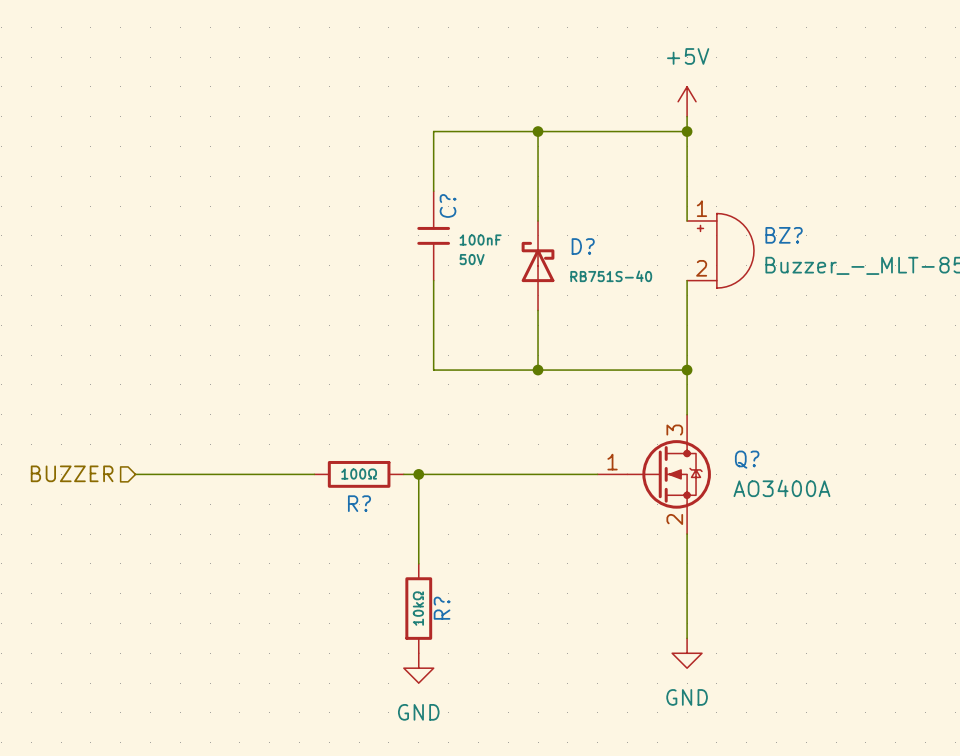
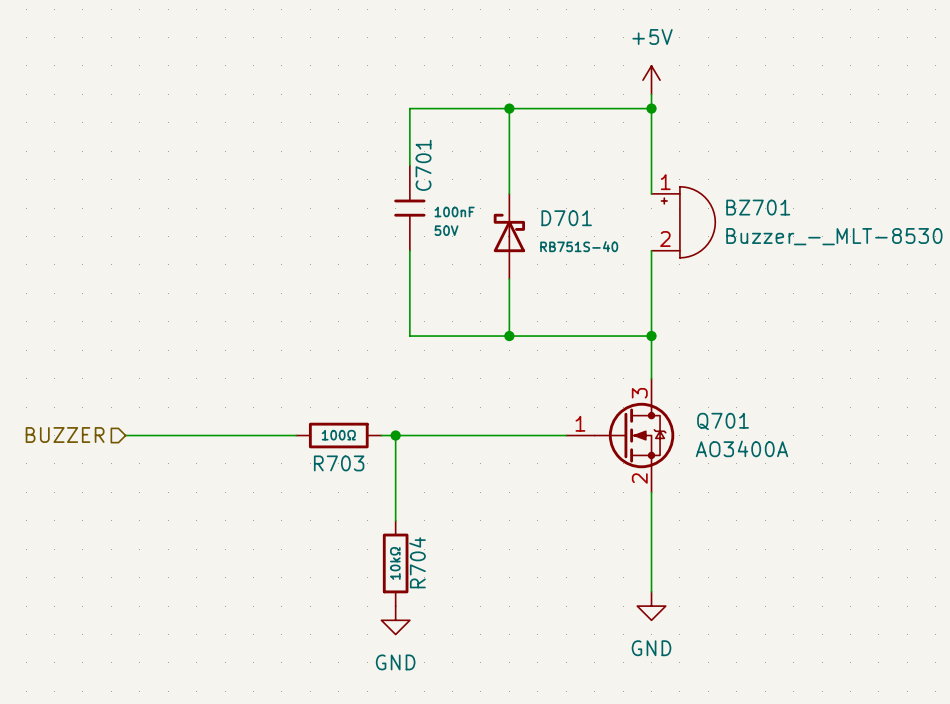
C? name: C? (448, 205) -> C701 (423, 165)
BZ? name: BZ? (784, 235) -> BZ701 (758, 207)
D? name: D? (583, 246) -> D701 (566, 218)
Q? name: Q? (747, 459) -> Q701 (723, 421)
R? name: R? (359, 503) -> R703 (339, 463)
R? name: R? (442, 608) -> R704 (417, 562)

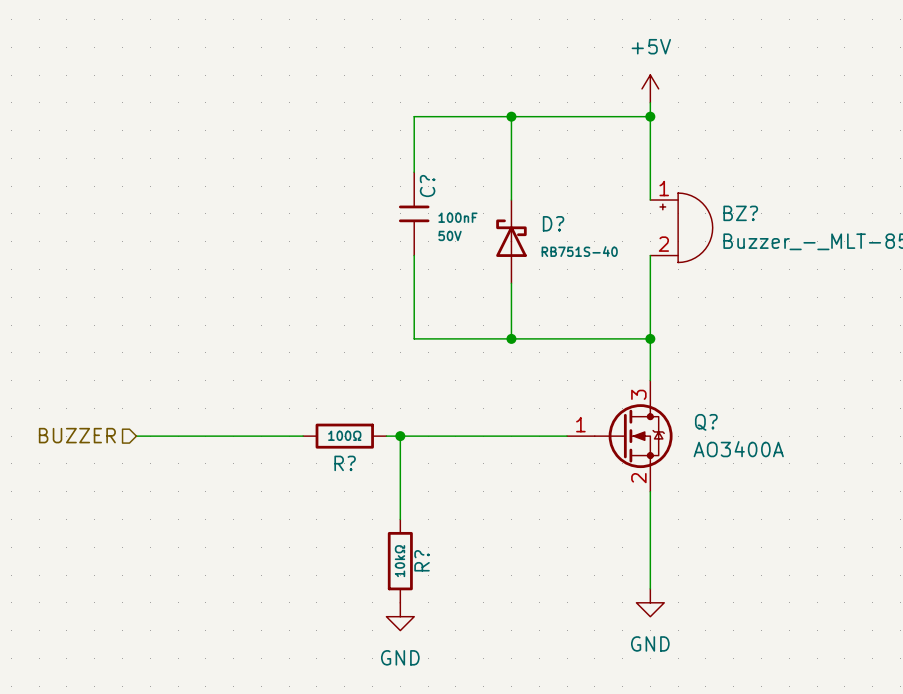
C701 name: C701 (423, 165) -> C? (427, 186)
BZ701 name: BZ701 (758, 207) -> BZ? (740, 213)
D701 name: D701 (566, 218) -> D? (553, 223)
Q701 name: Q701 (723, 421) -> Q? (706, 422)
R703 name: R703 (339, 463) -> R? (345, 463)
R704 name: R704 (417, 562) -> R? (422, 560)

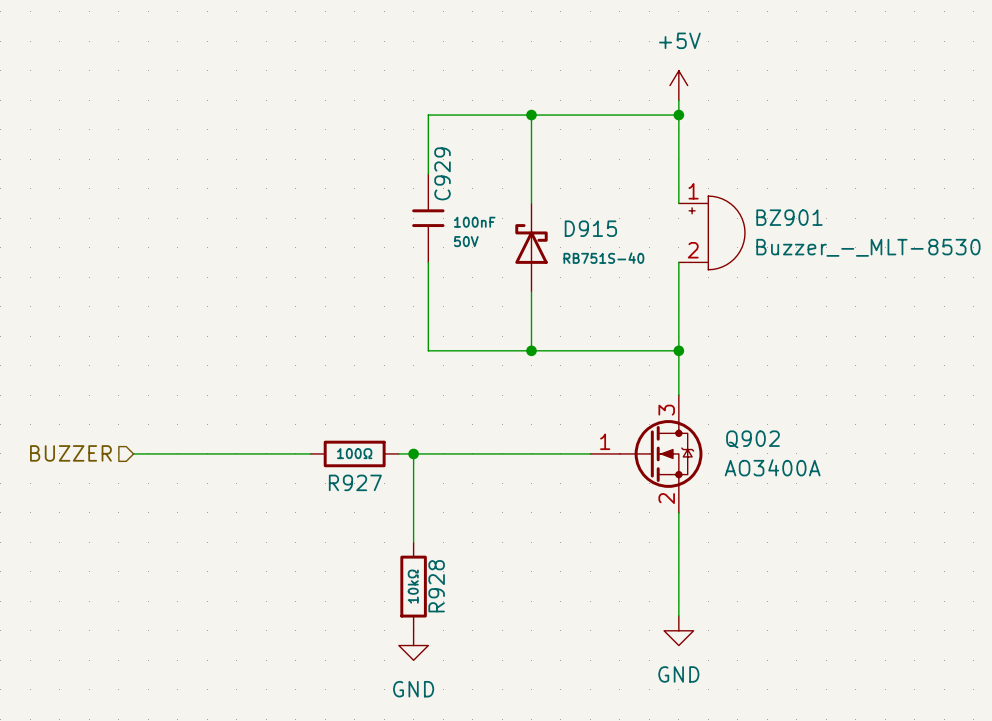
C? name: C? (427, 186) -> C929 (442, 173)
BZ? name: BZ? (740, 213) -> BZ901 (789, 217)
D? name: D? (553, 223) -> D915 (590, 228)
Q? name: Q? (706, 422) -> Q902 (752, 439)
R? name: R? (345, 463) -> R927 (355, 482)
R? name: R? (422, 560) -> R928 (436, 586)

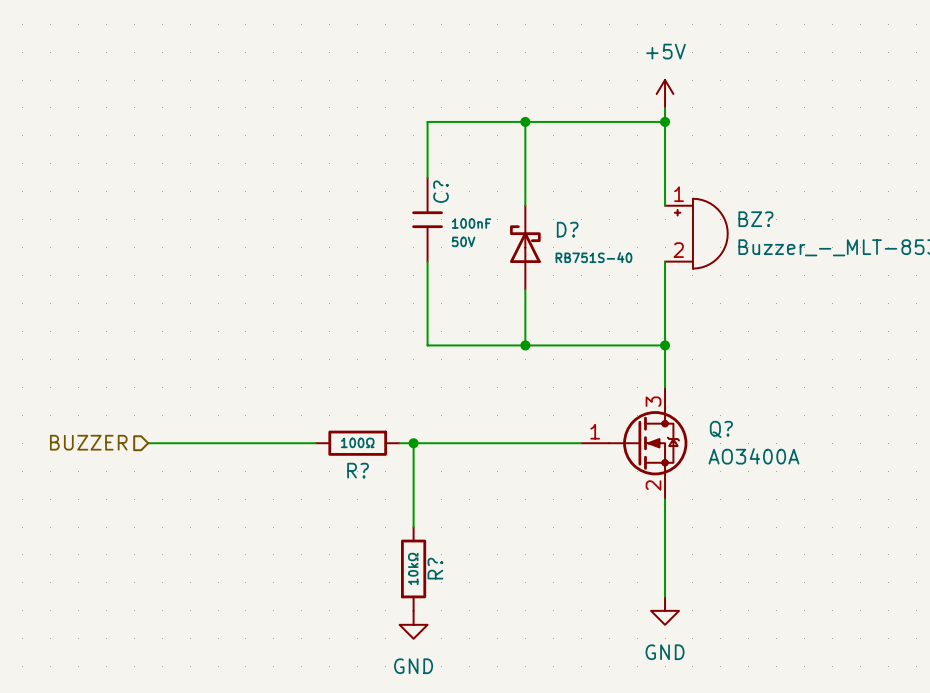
C929 name: C929 (442, 173) -> C? (441, 191)
BZ901 name: BZ901 (789, 217) -> BZ? (755, 219)
D915 name: D915 (590, 228) -> D? (567, 229)
Q902 name: Q902 (752, 439) -> Q? (721, 429)
R927 name: R927 (355, 482) -> R? (358, 470)
R928 name: R928 (436, 586) -> R? (435, 568)

